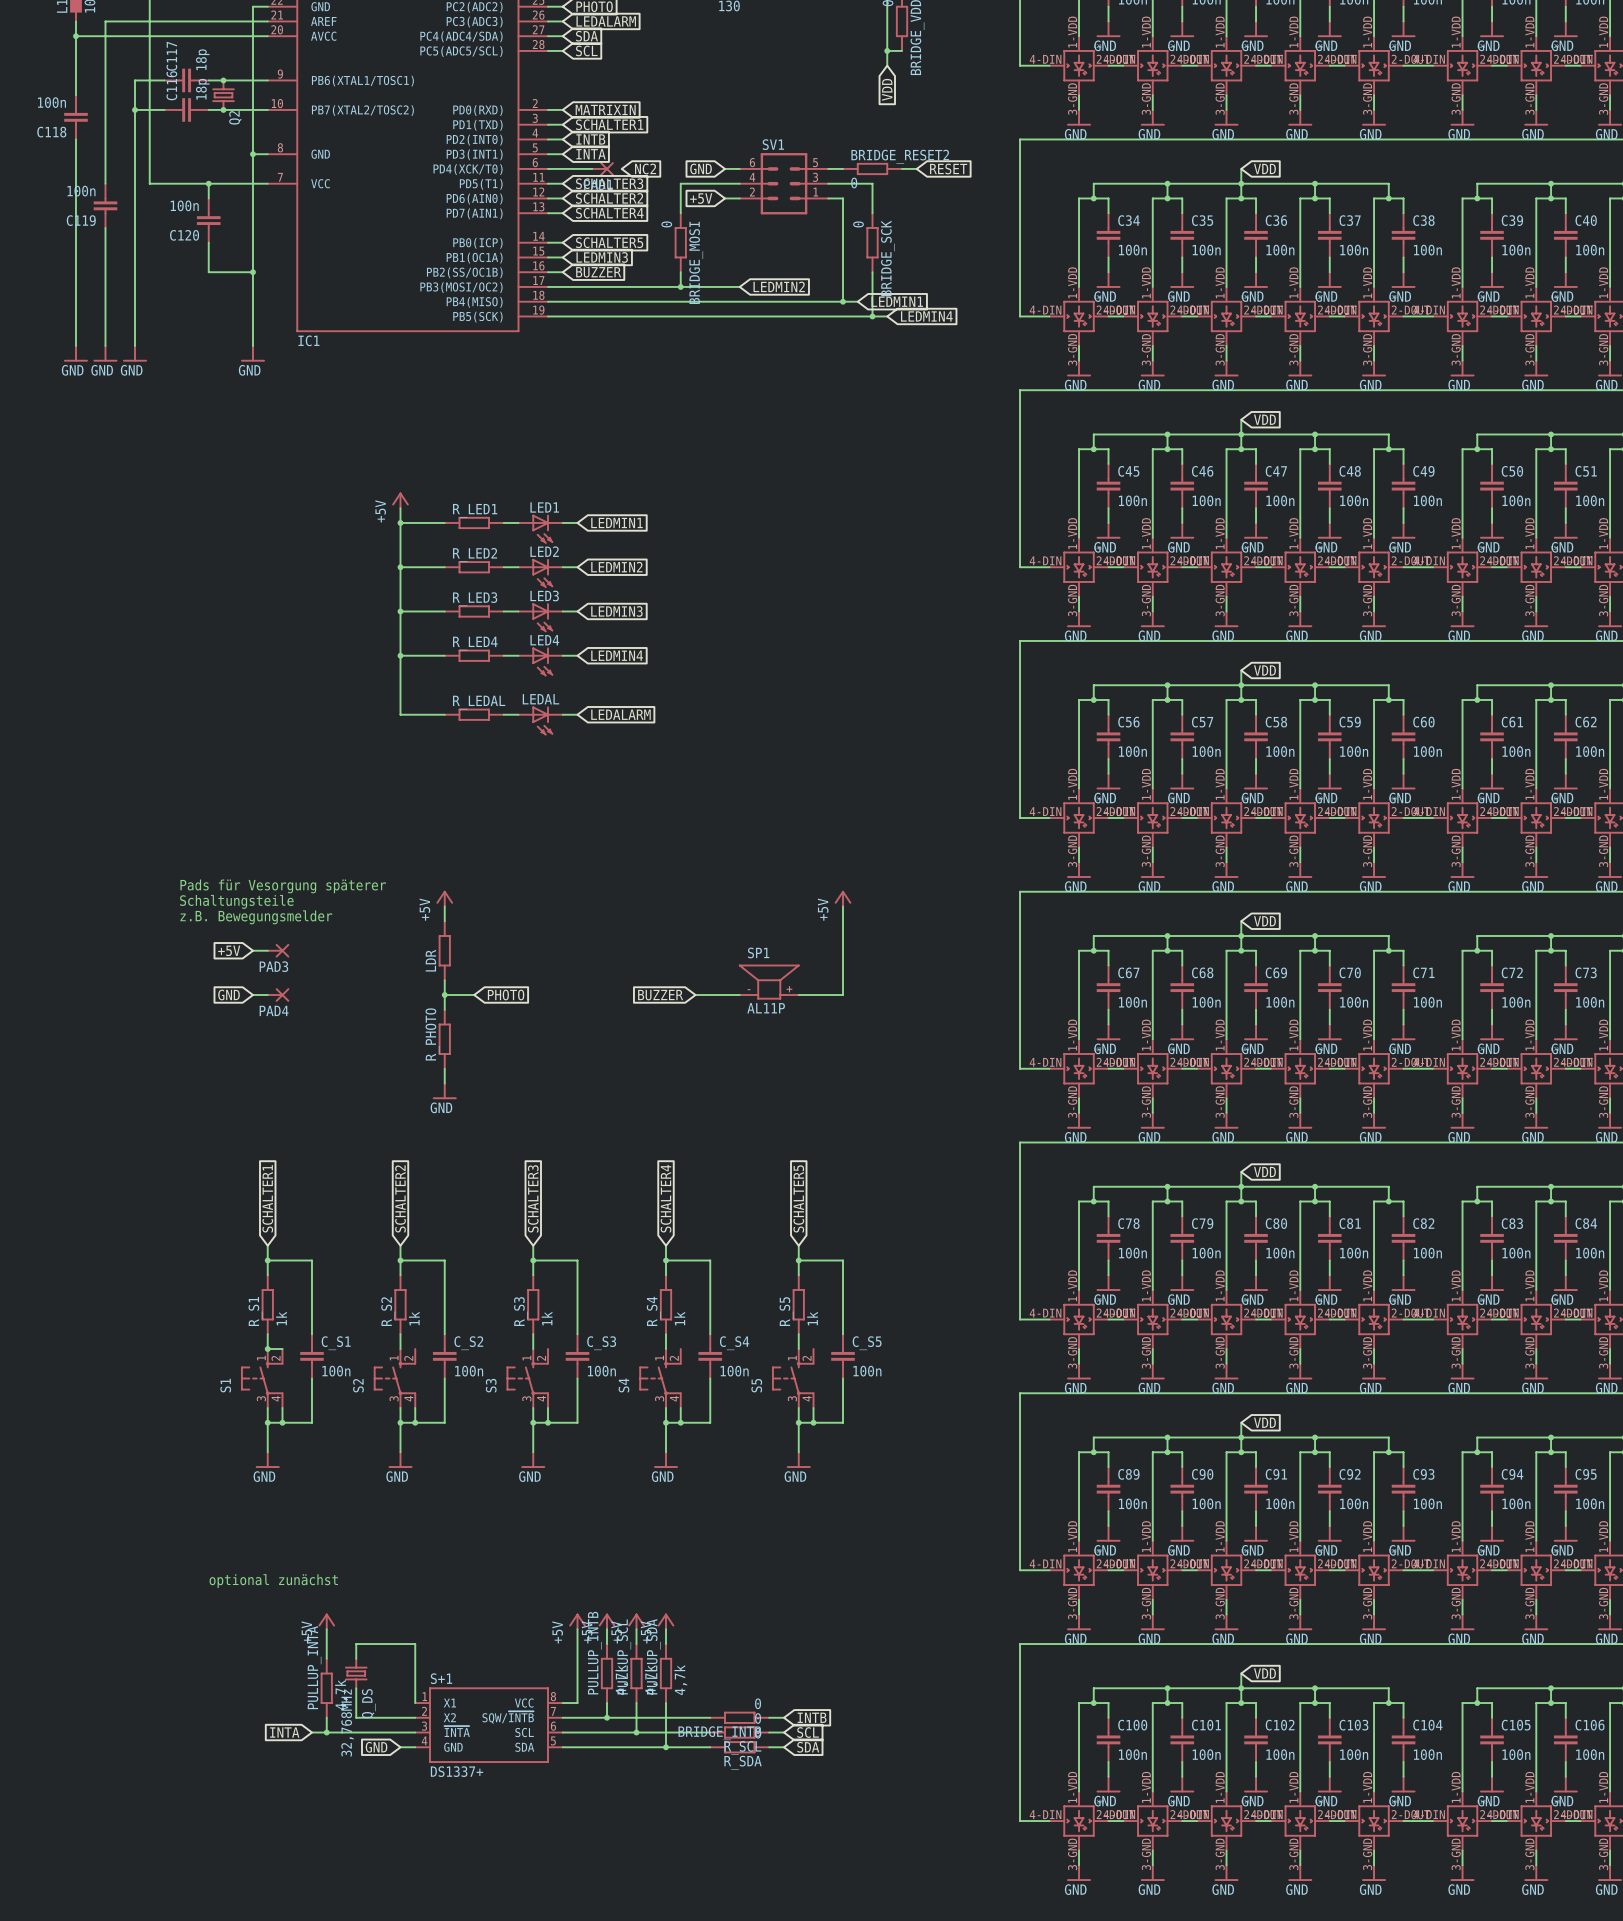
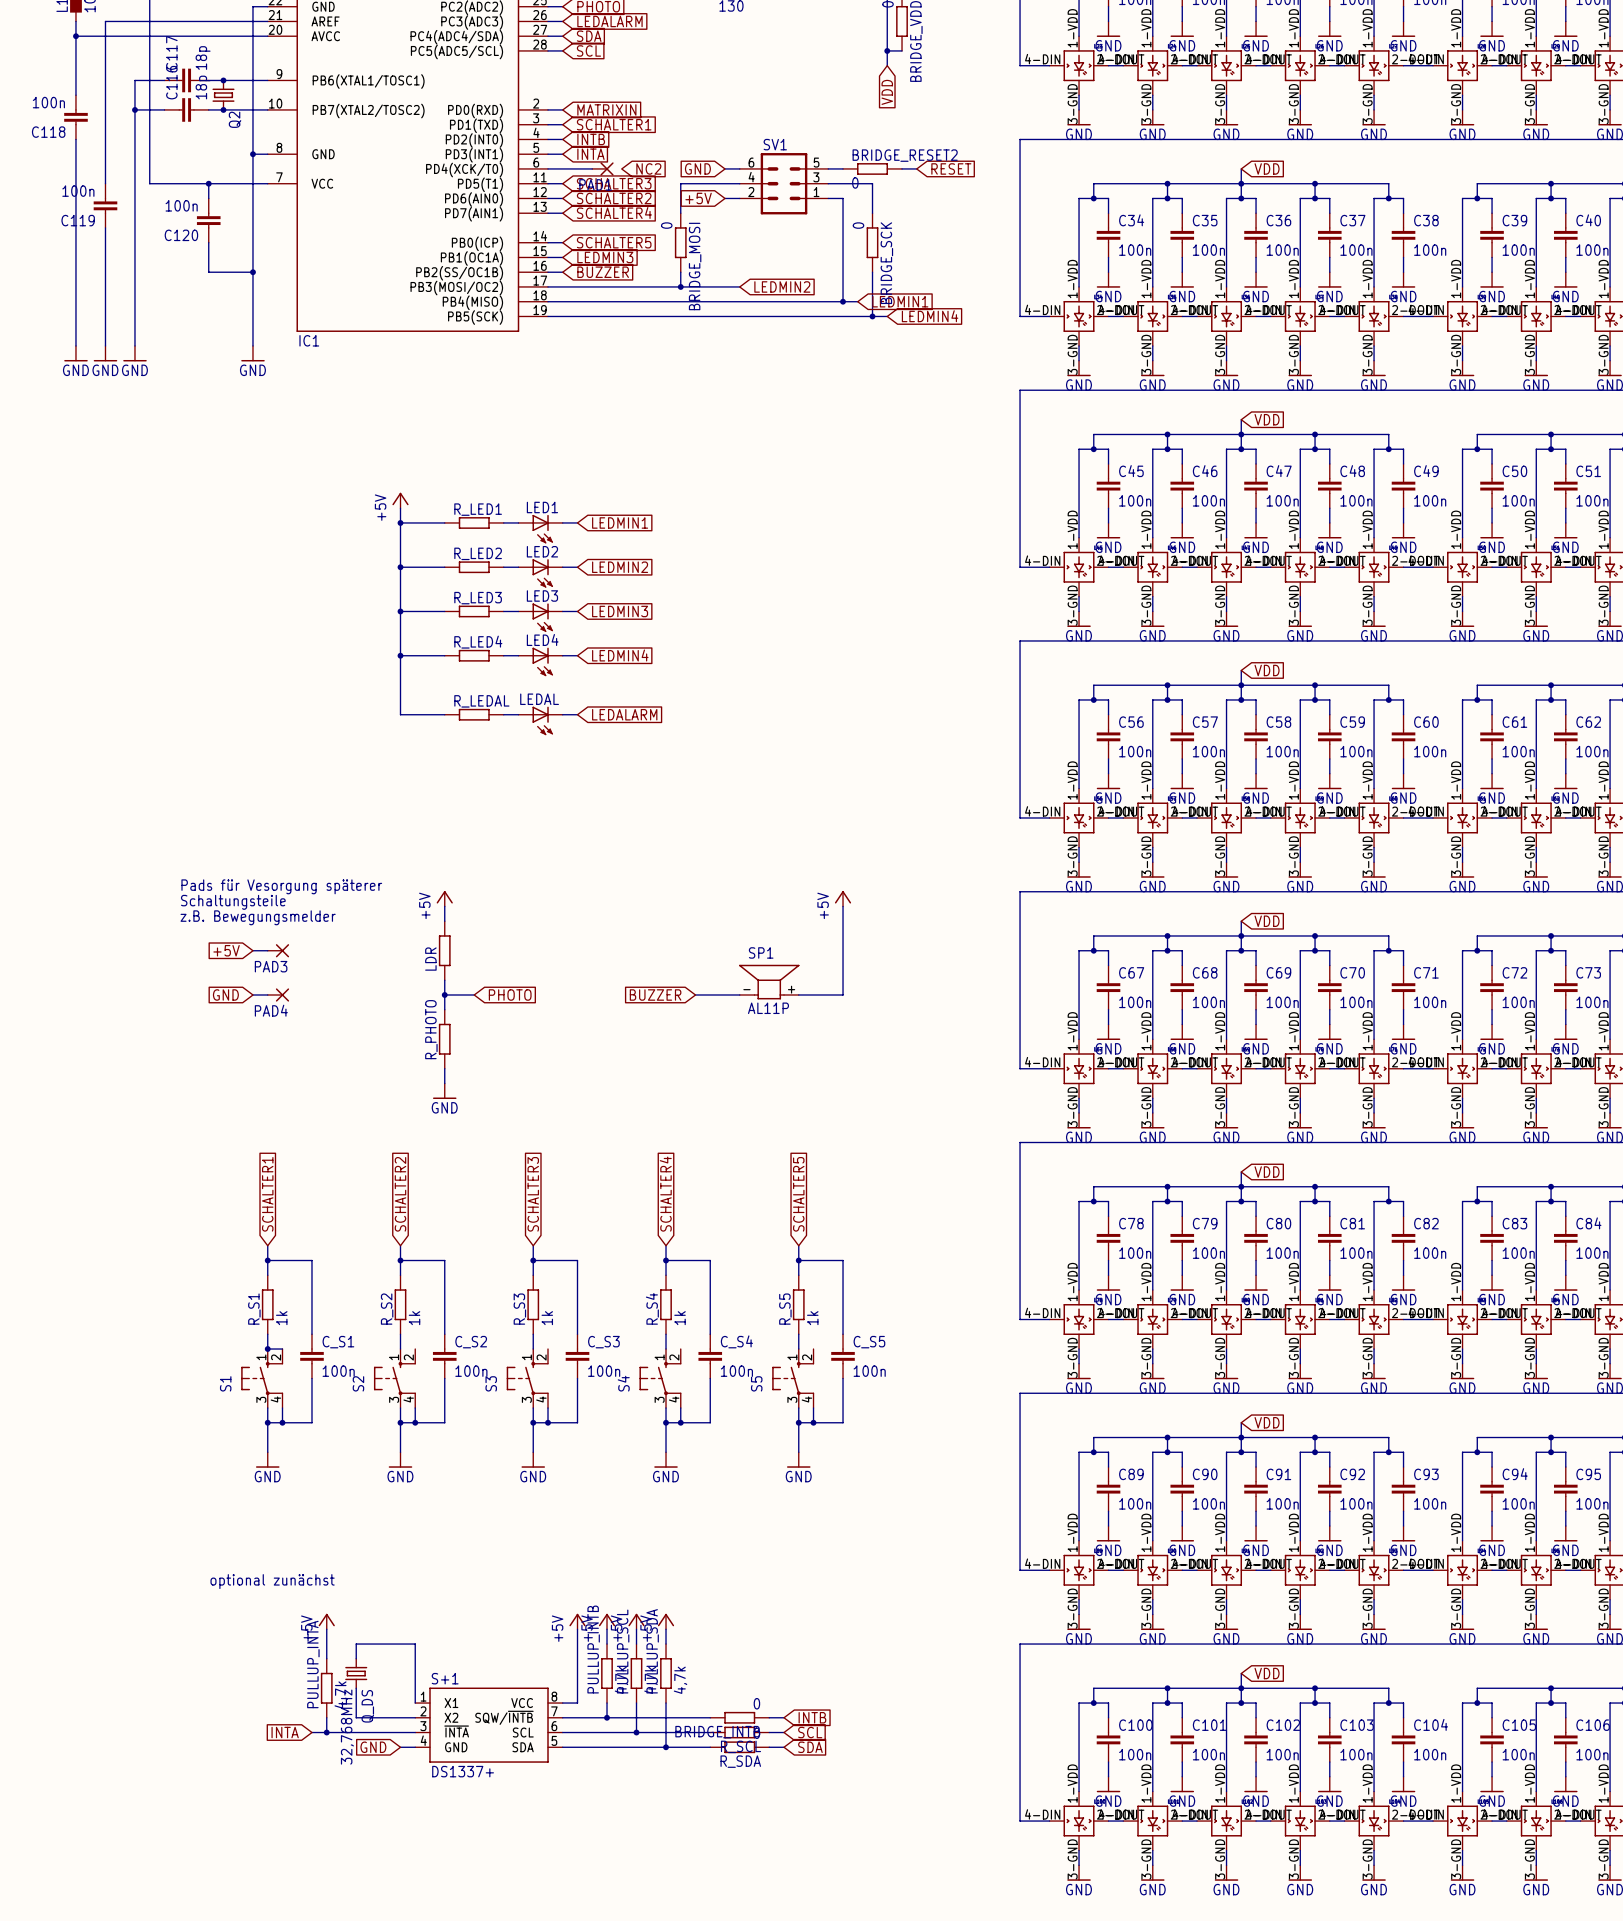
R_SCL value: 0 (758, 1718) -> none

